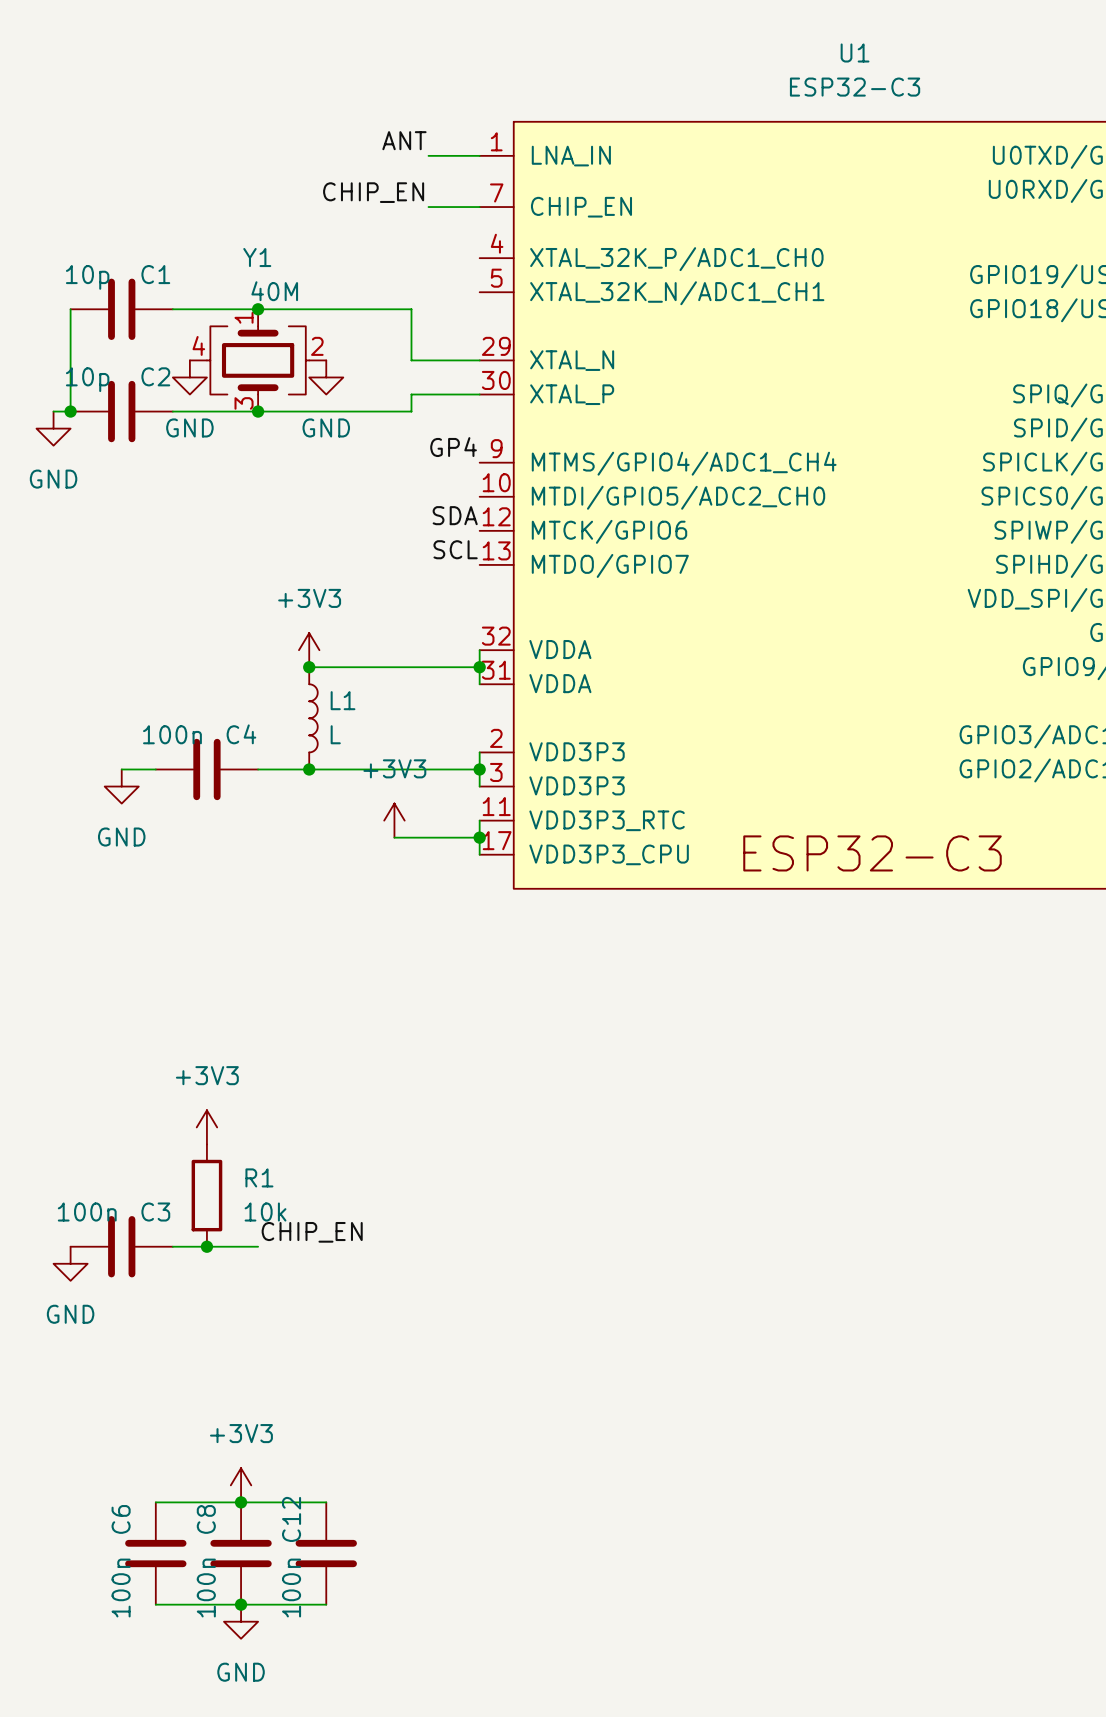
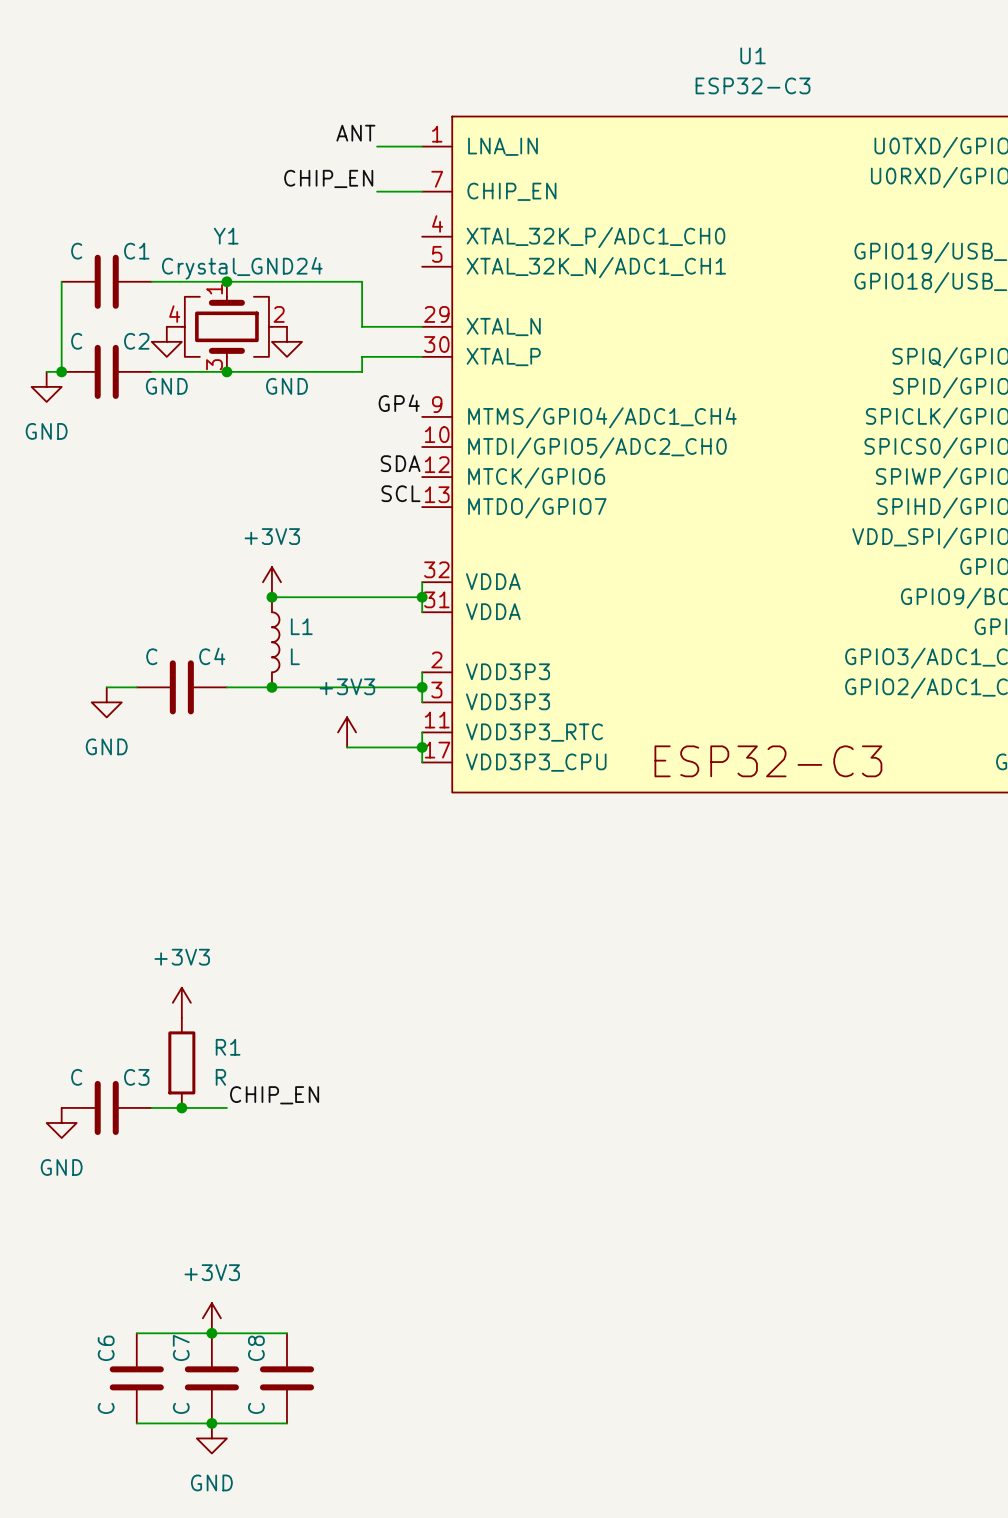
C1 value: 10p (87, 277) -> C (76, 251)
Y1 value: 40M (274, 291) -> Crystal_GND24 (242, 268)
C2 value: 10p (87, 379) -> C (76, 341)
C4 value: 100n (172, 734) -> C (151, 656)
C3 value: 100n (87, 1212) -> C (76, 1077)
R1 value: 10k (265, 1212) -> R (220, 1077)
C8 name: C8 (206, 1519) -> C7 (181, 1347)
C12 name: C12 (291, 1519) -> C8 (256, 1348)
C6 value: 100n (121, 1588) -> C (106, 1408)
C8 value: 100n (206, 1588) -> C (181, 1408)
C12 value: 100n (291, 1588) -> C (256, 1408)

